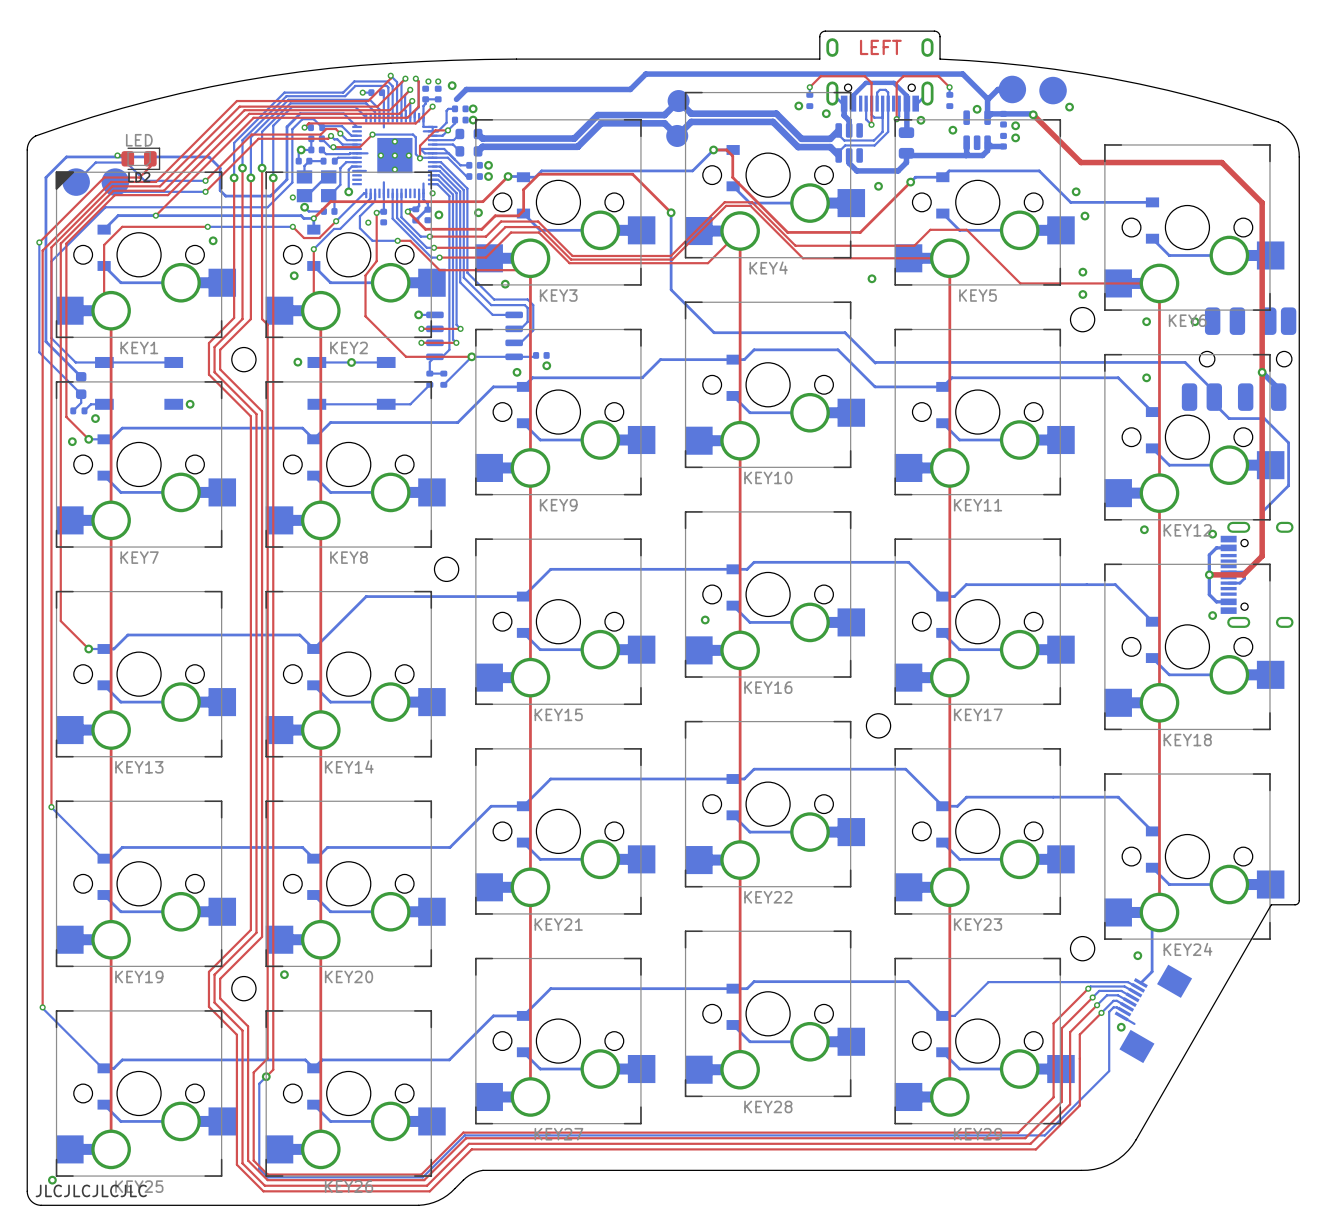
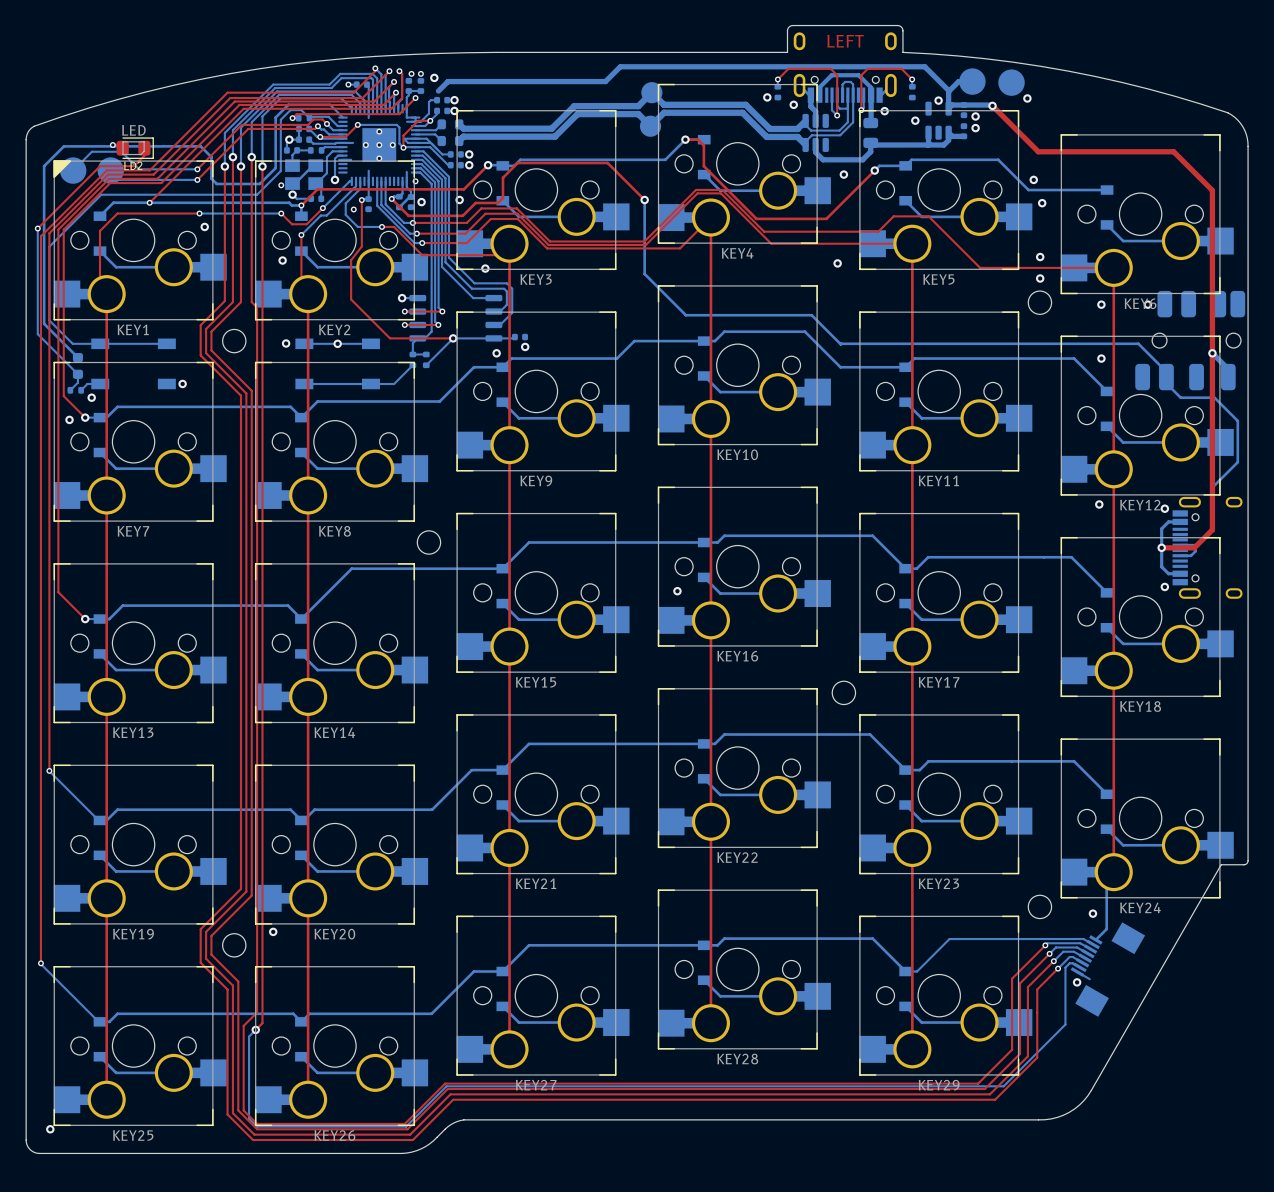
text: JLCJLCJLCJLC (91, 1190) -> none

